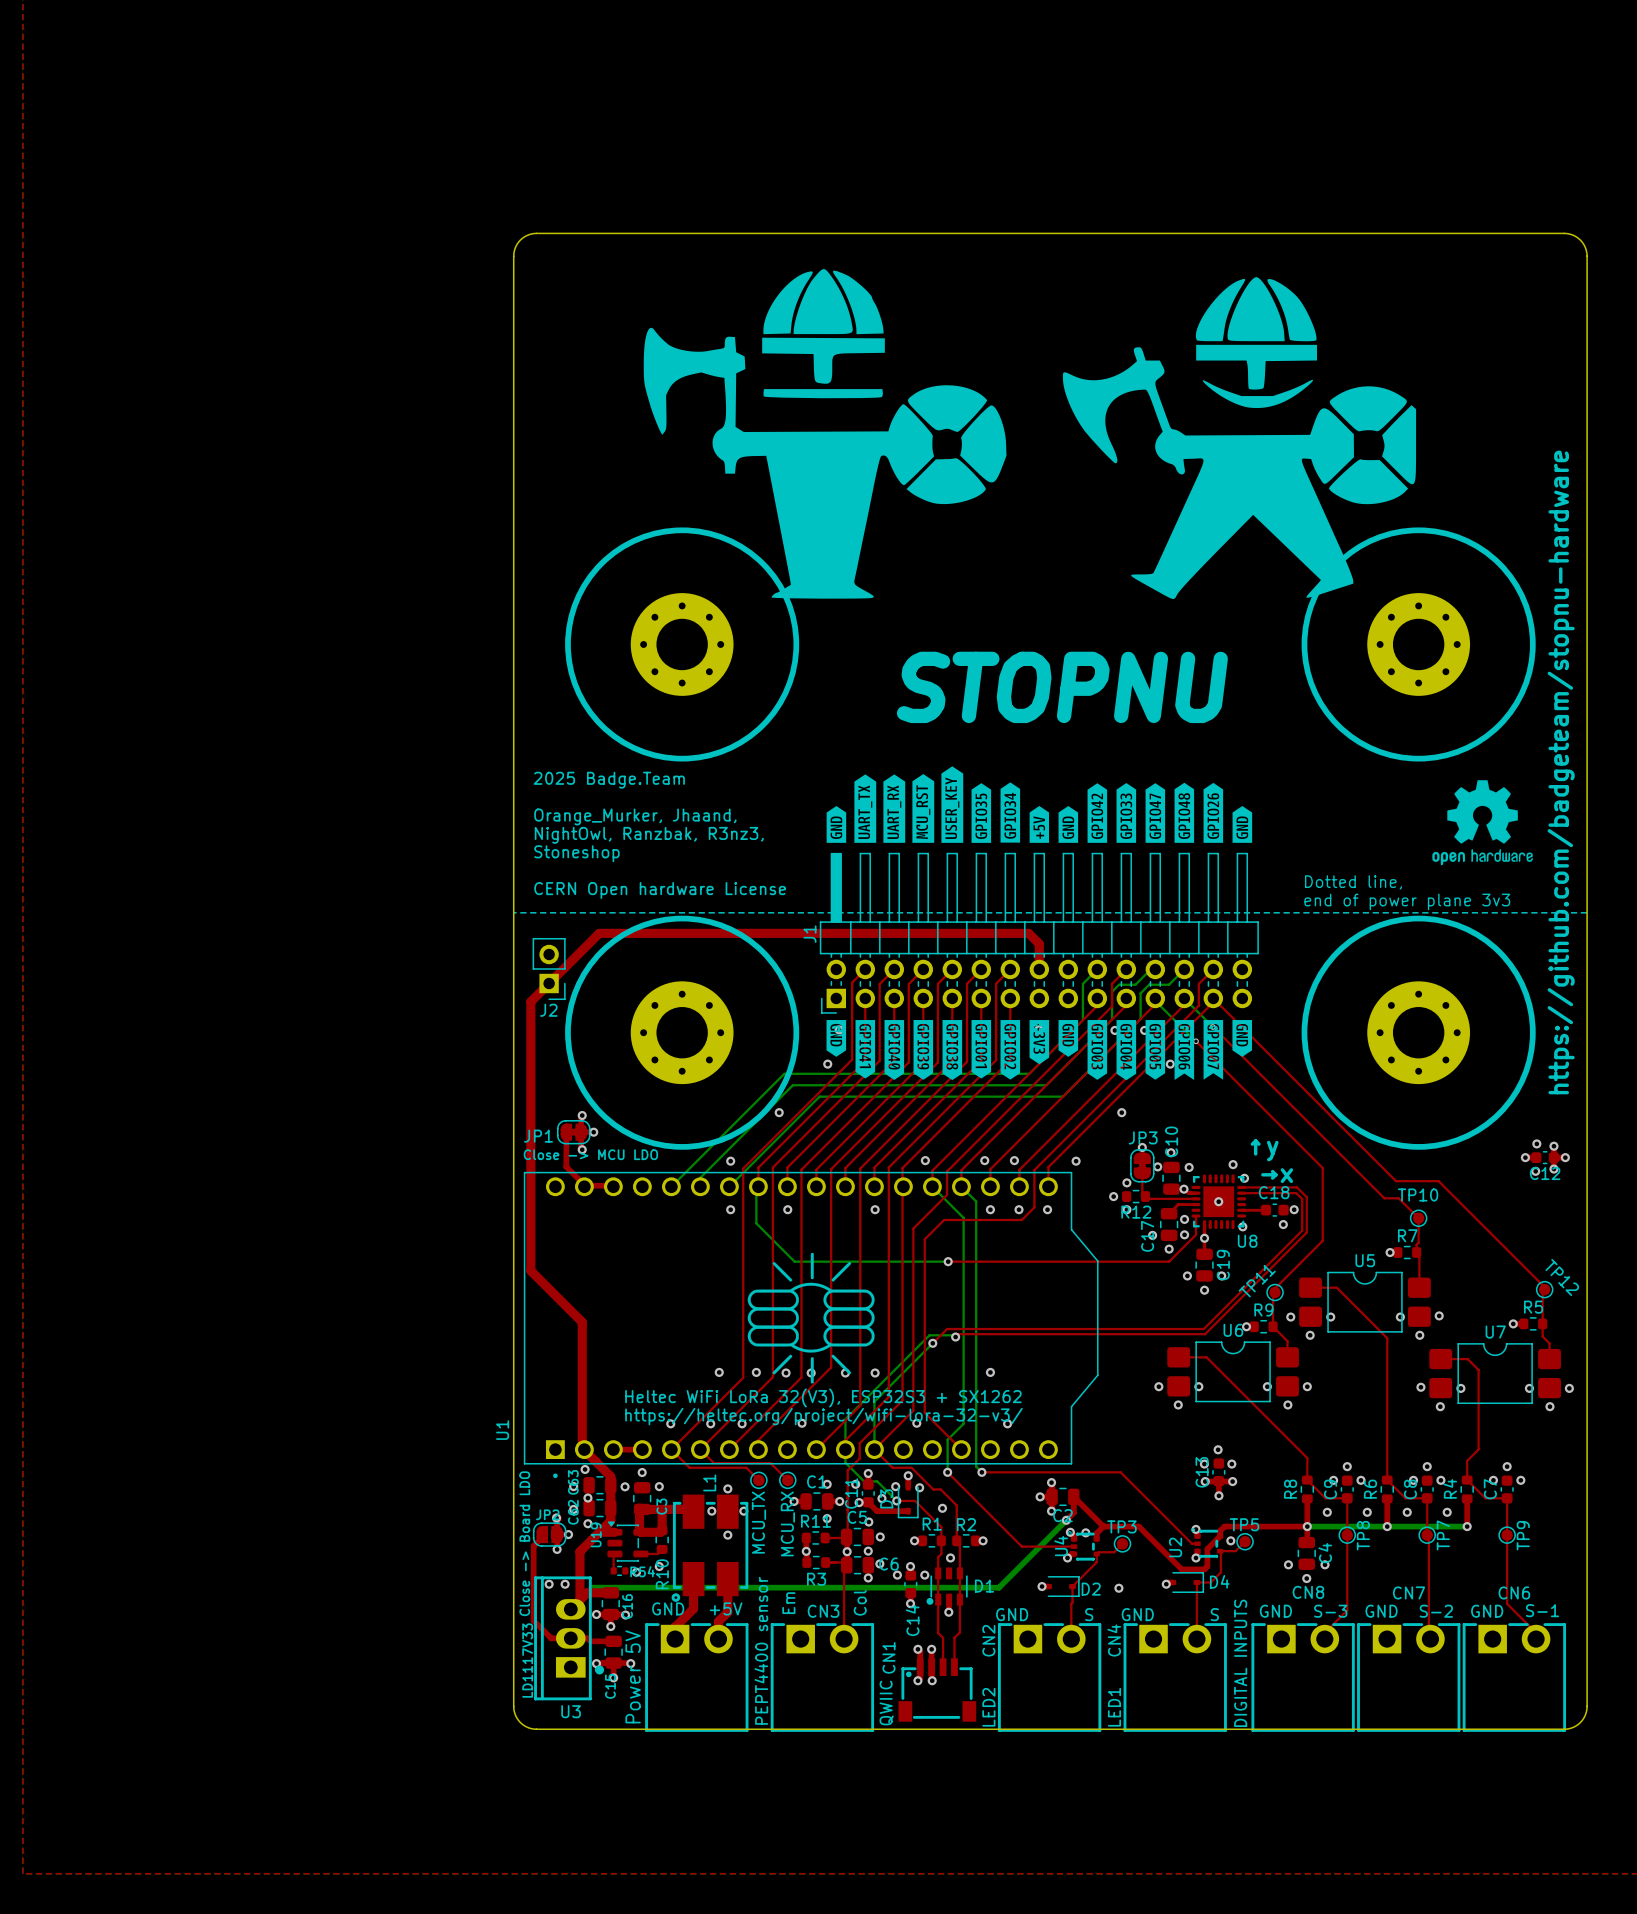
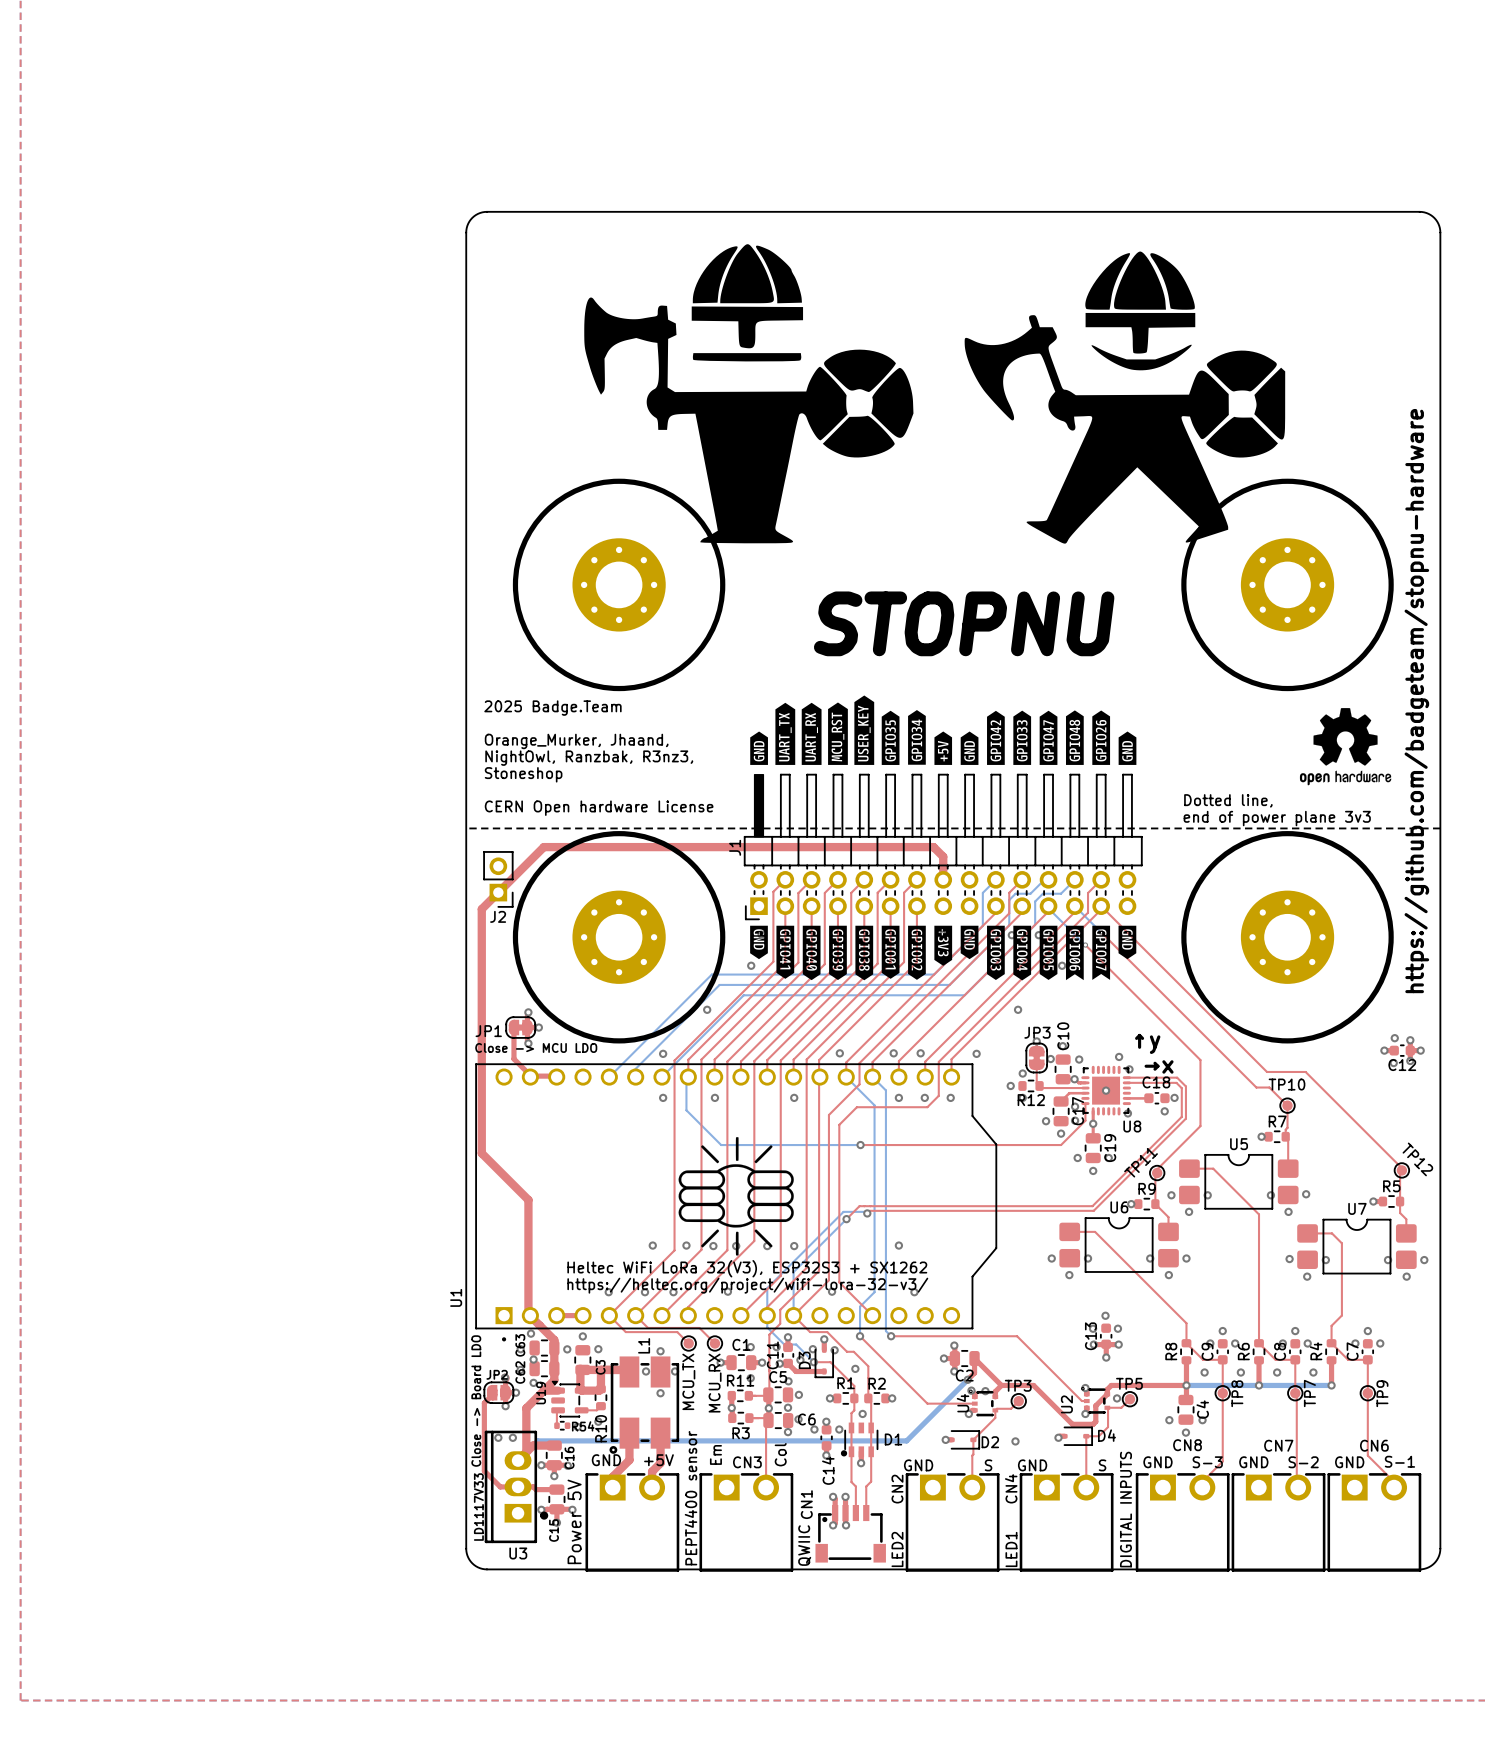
C17 name position: C17 (1147, 1236) -> C17 (1078, 1111)

